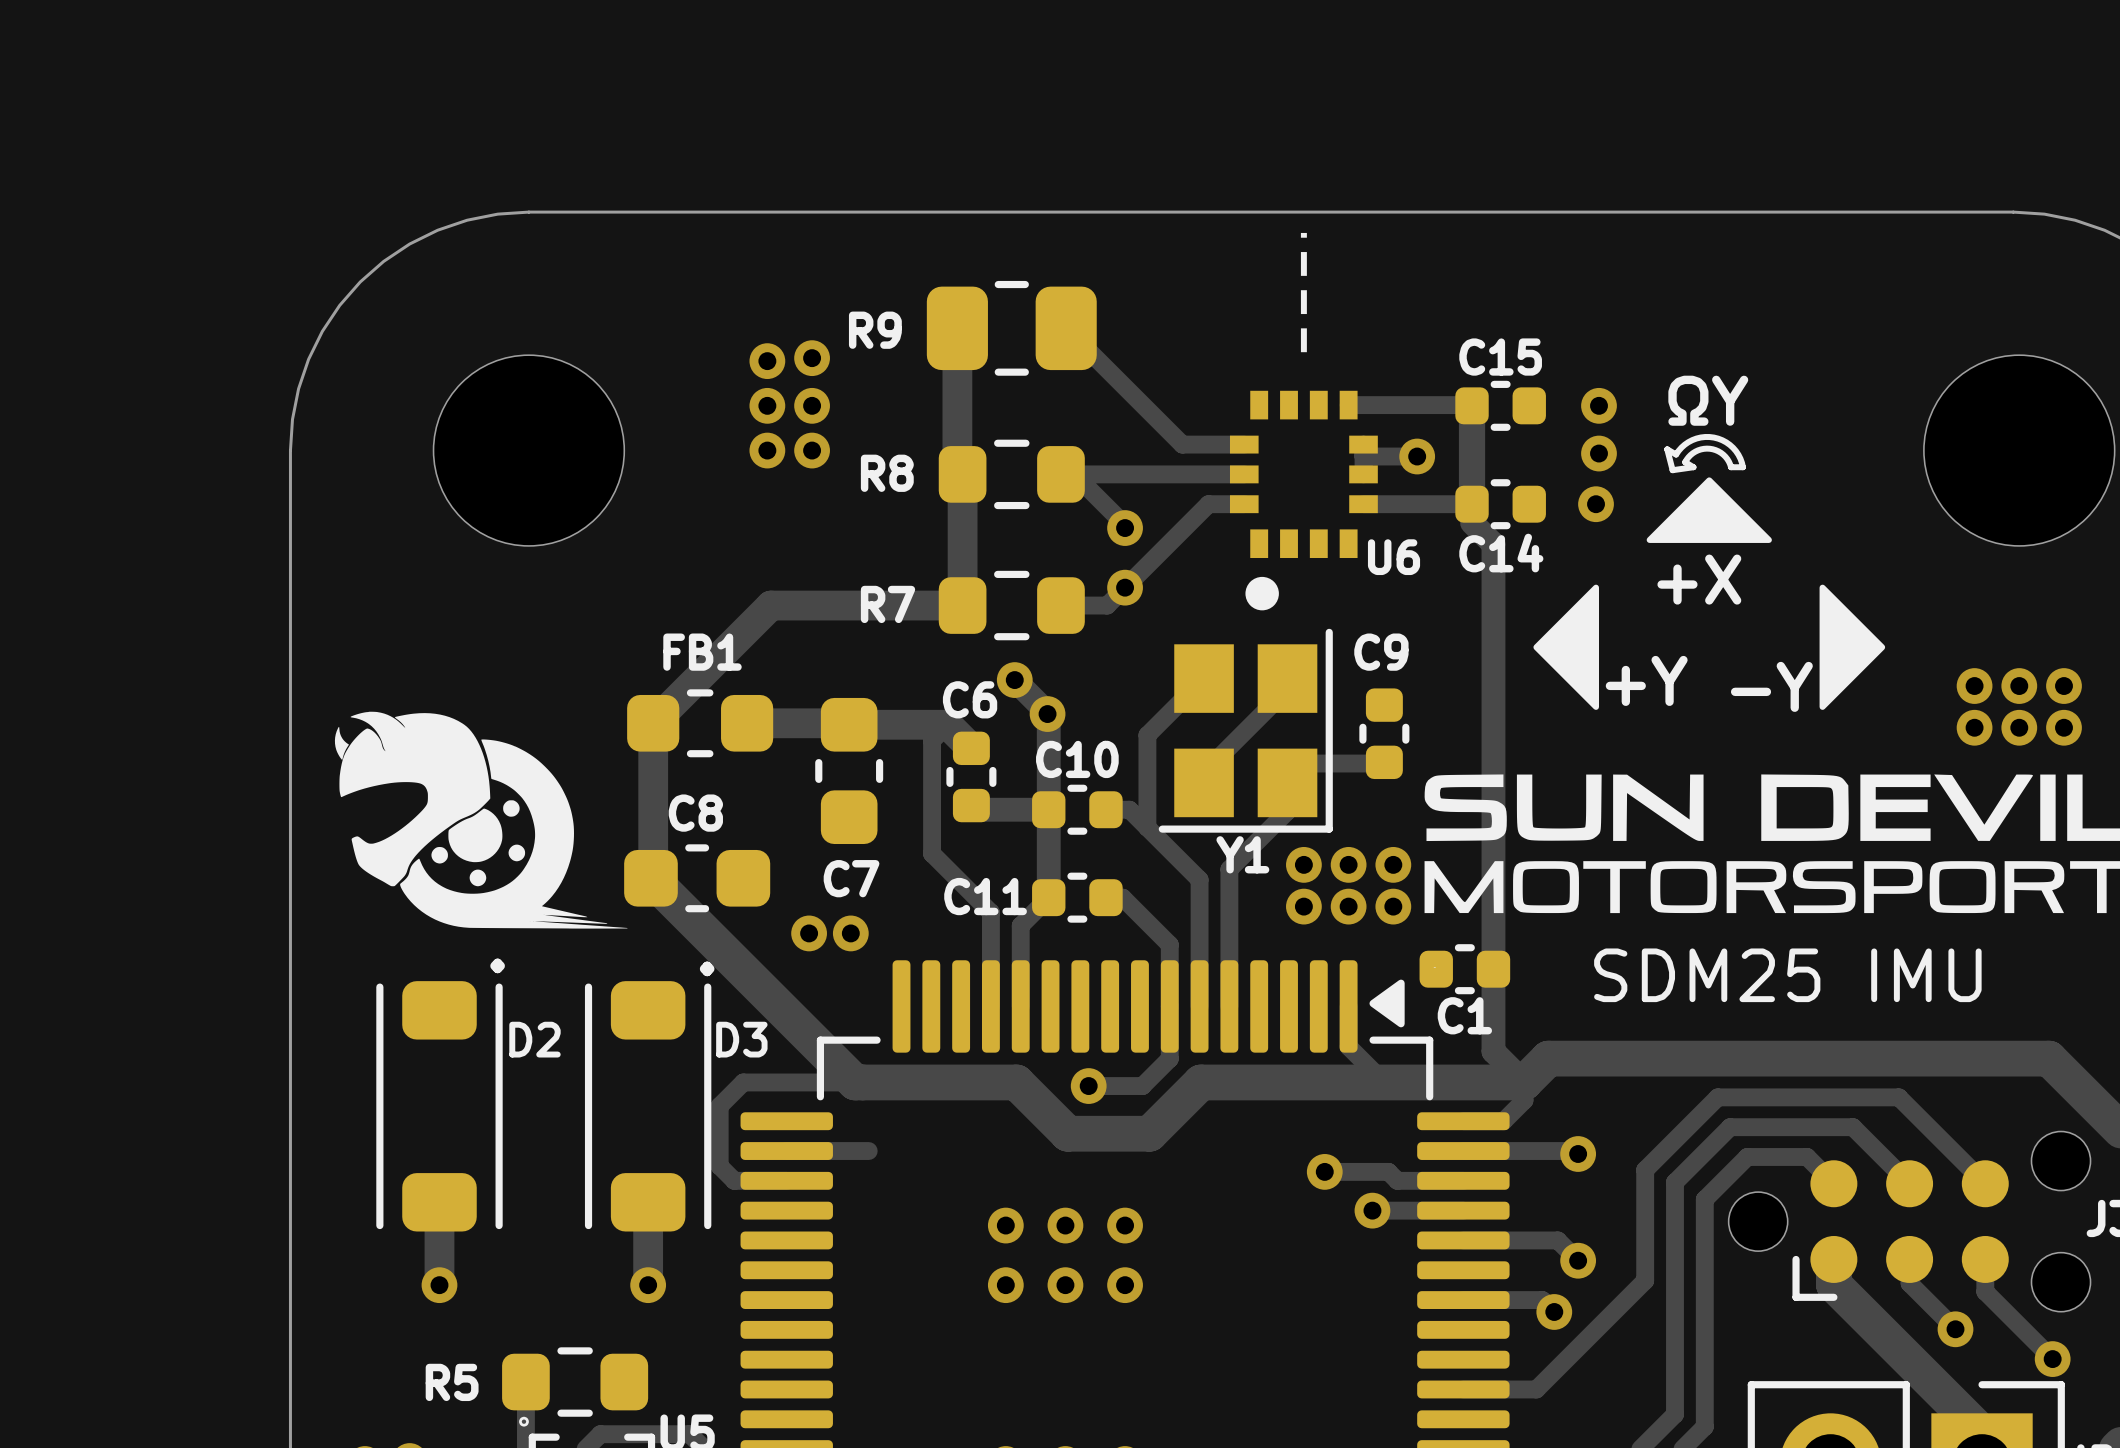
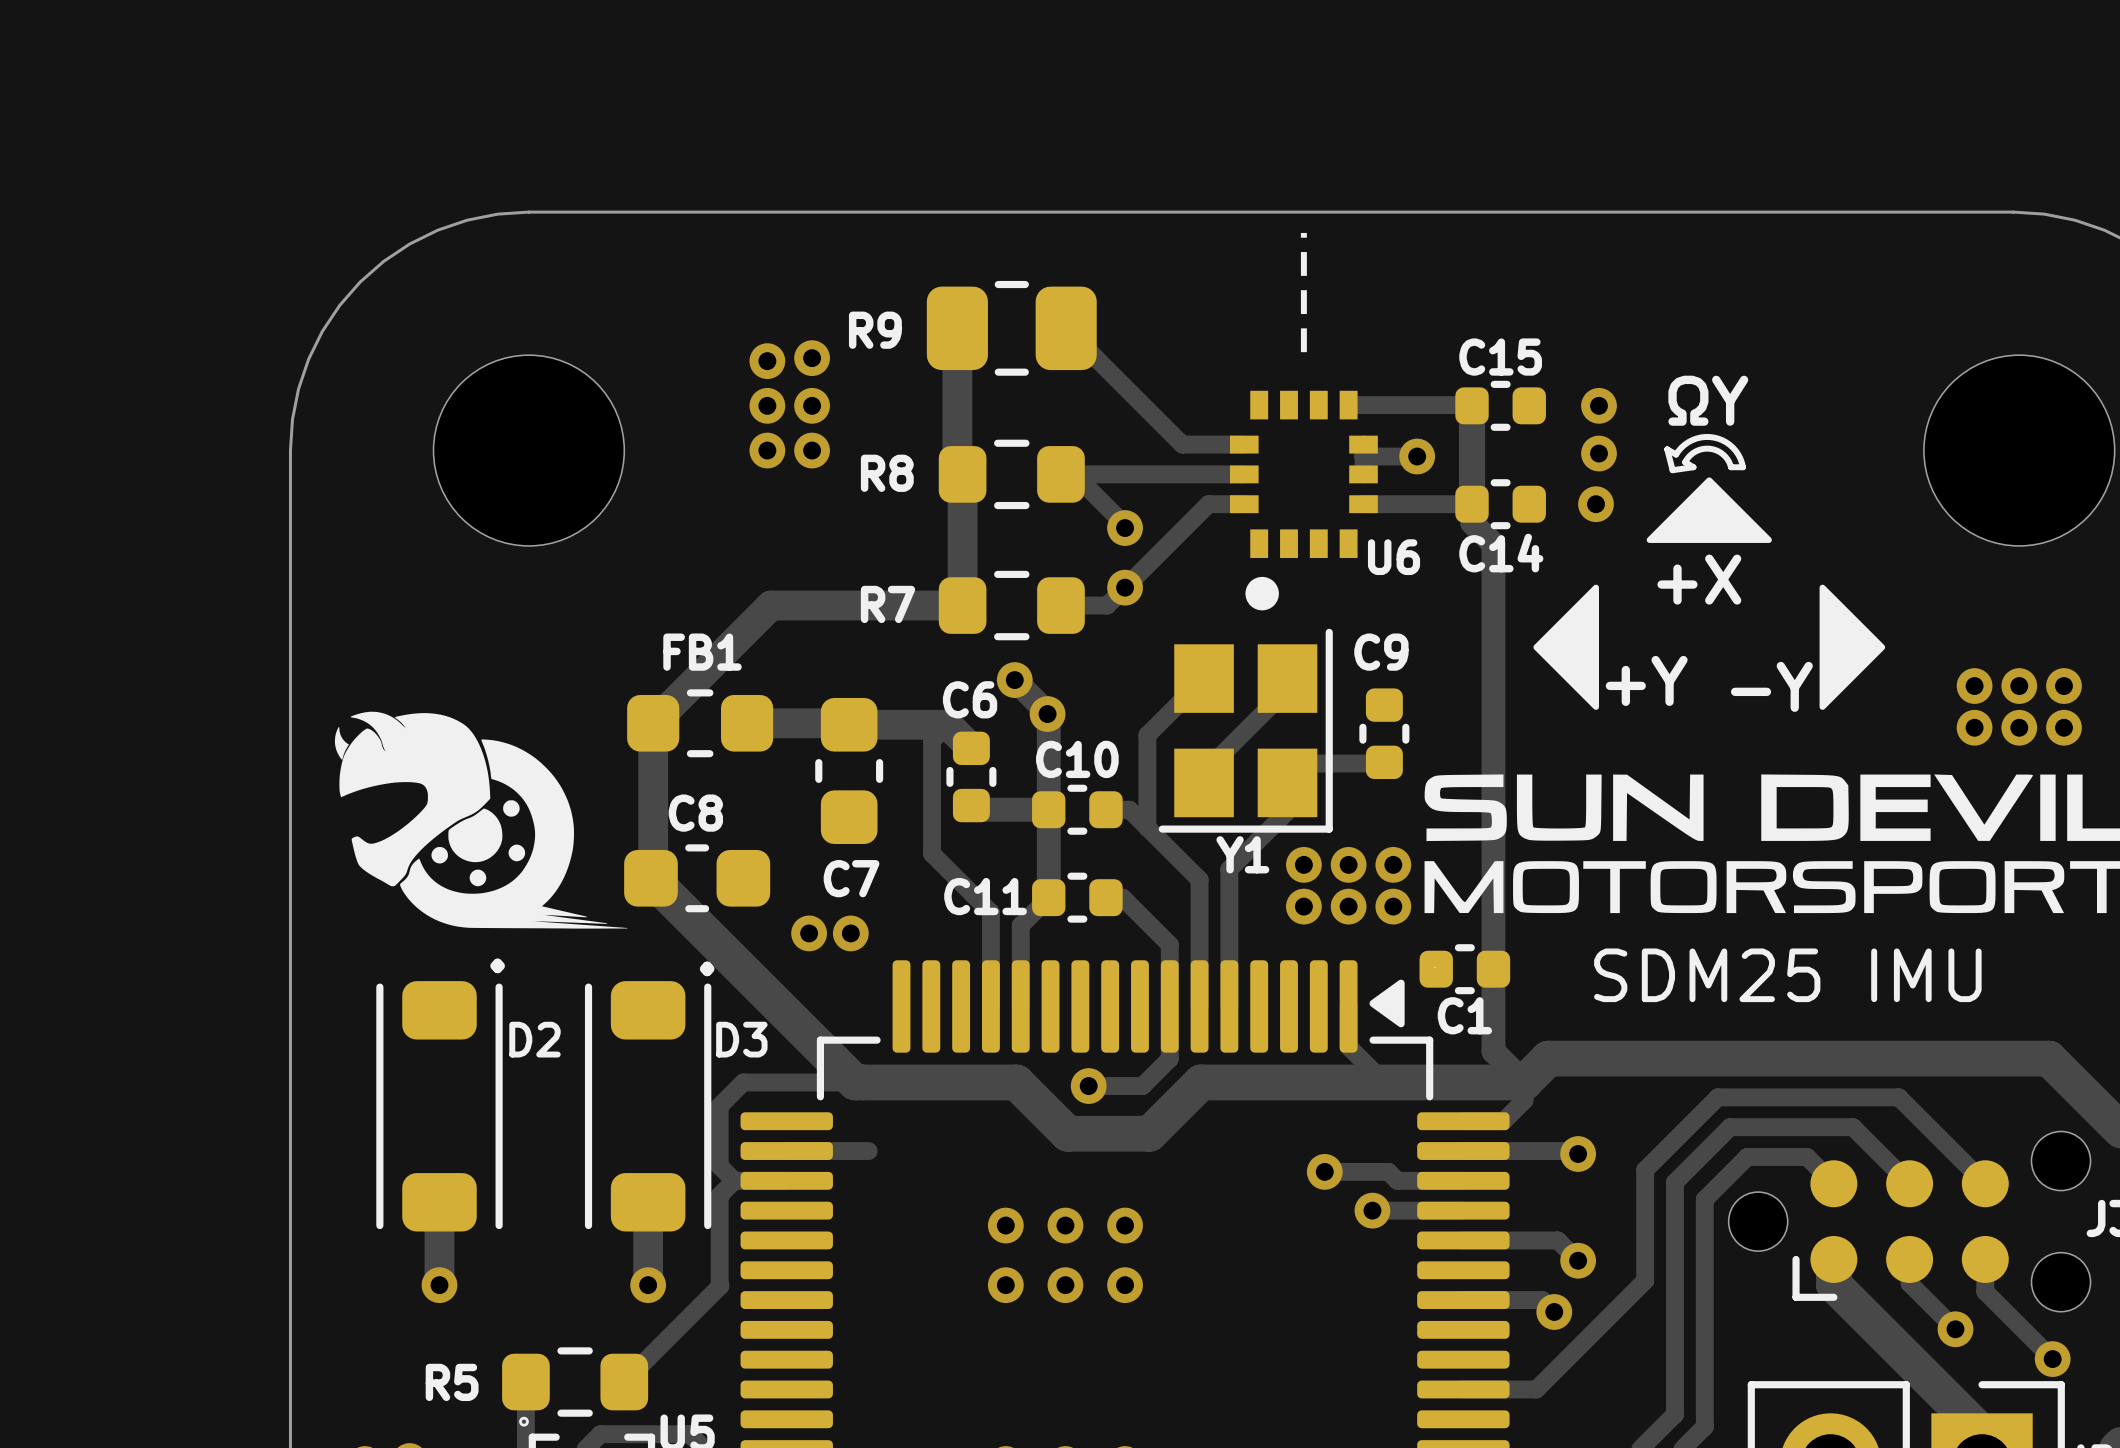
track: none -> (734, 1180) (719, 1195) (719, 1285)
track: none -> (720, 1286) (624, 1382)

